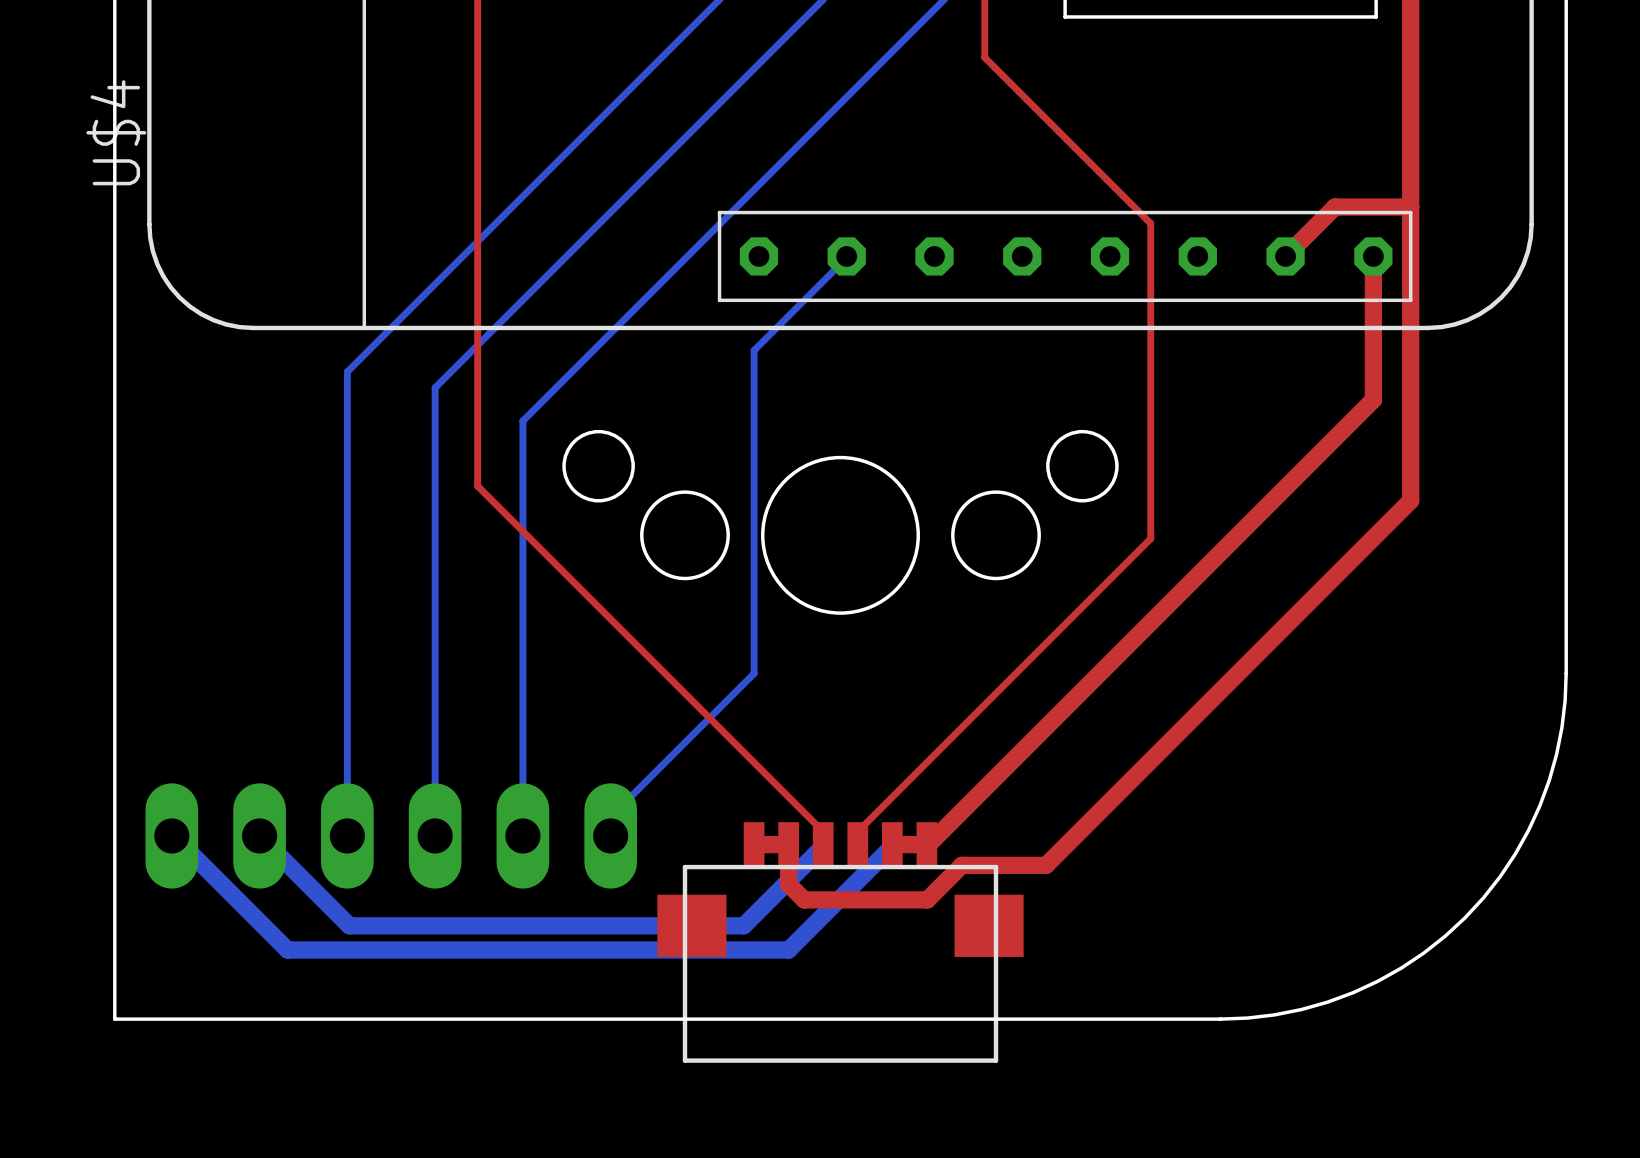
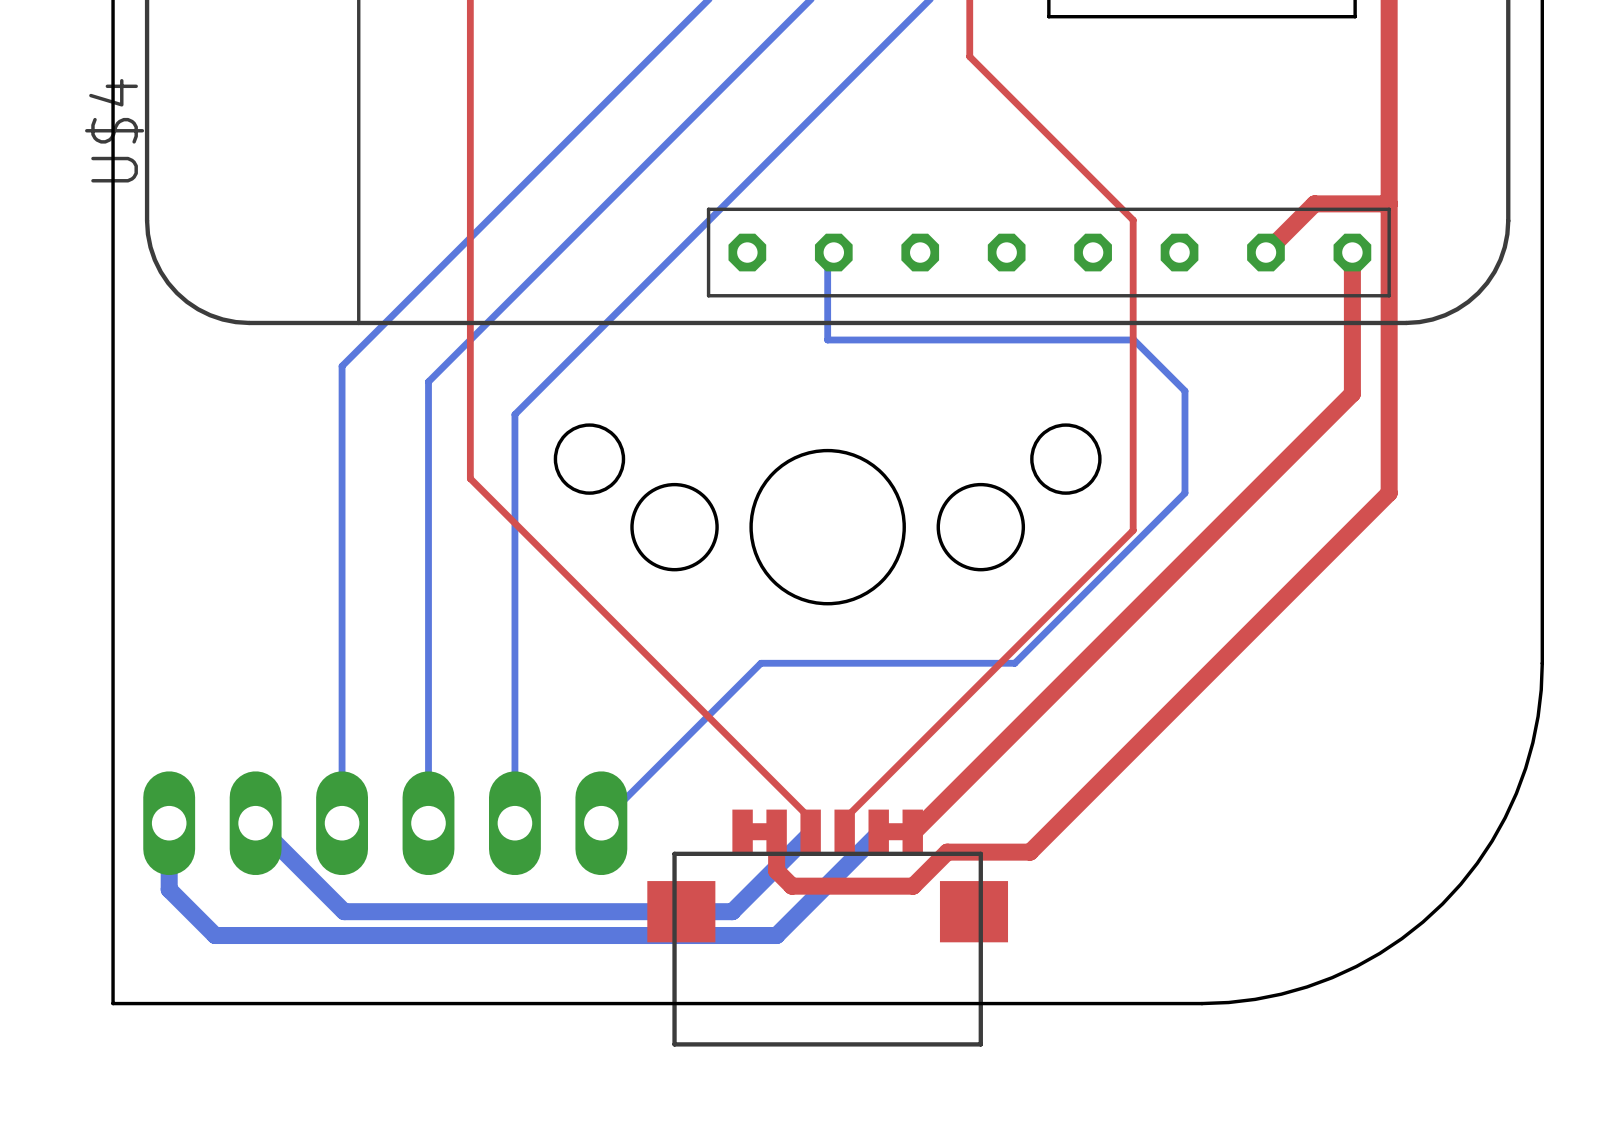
bottom track: (846, 256) (754, 350) (754, 673) (610, 816) (610, 835) -> (833, 252) (827, 258) (827, 339) (1133, 339) (1184, 391) (1184, 493) (1014, 663) (760, 663) (601, 822)
bottom track: (171, 835) (287, 950) -> (169, 822) (169, 889) (215, 935) (283, 935)

